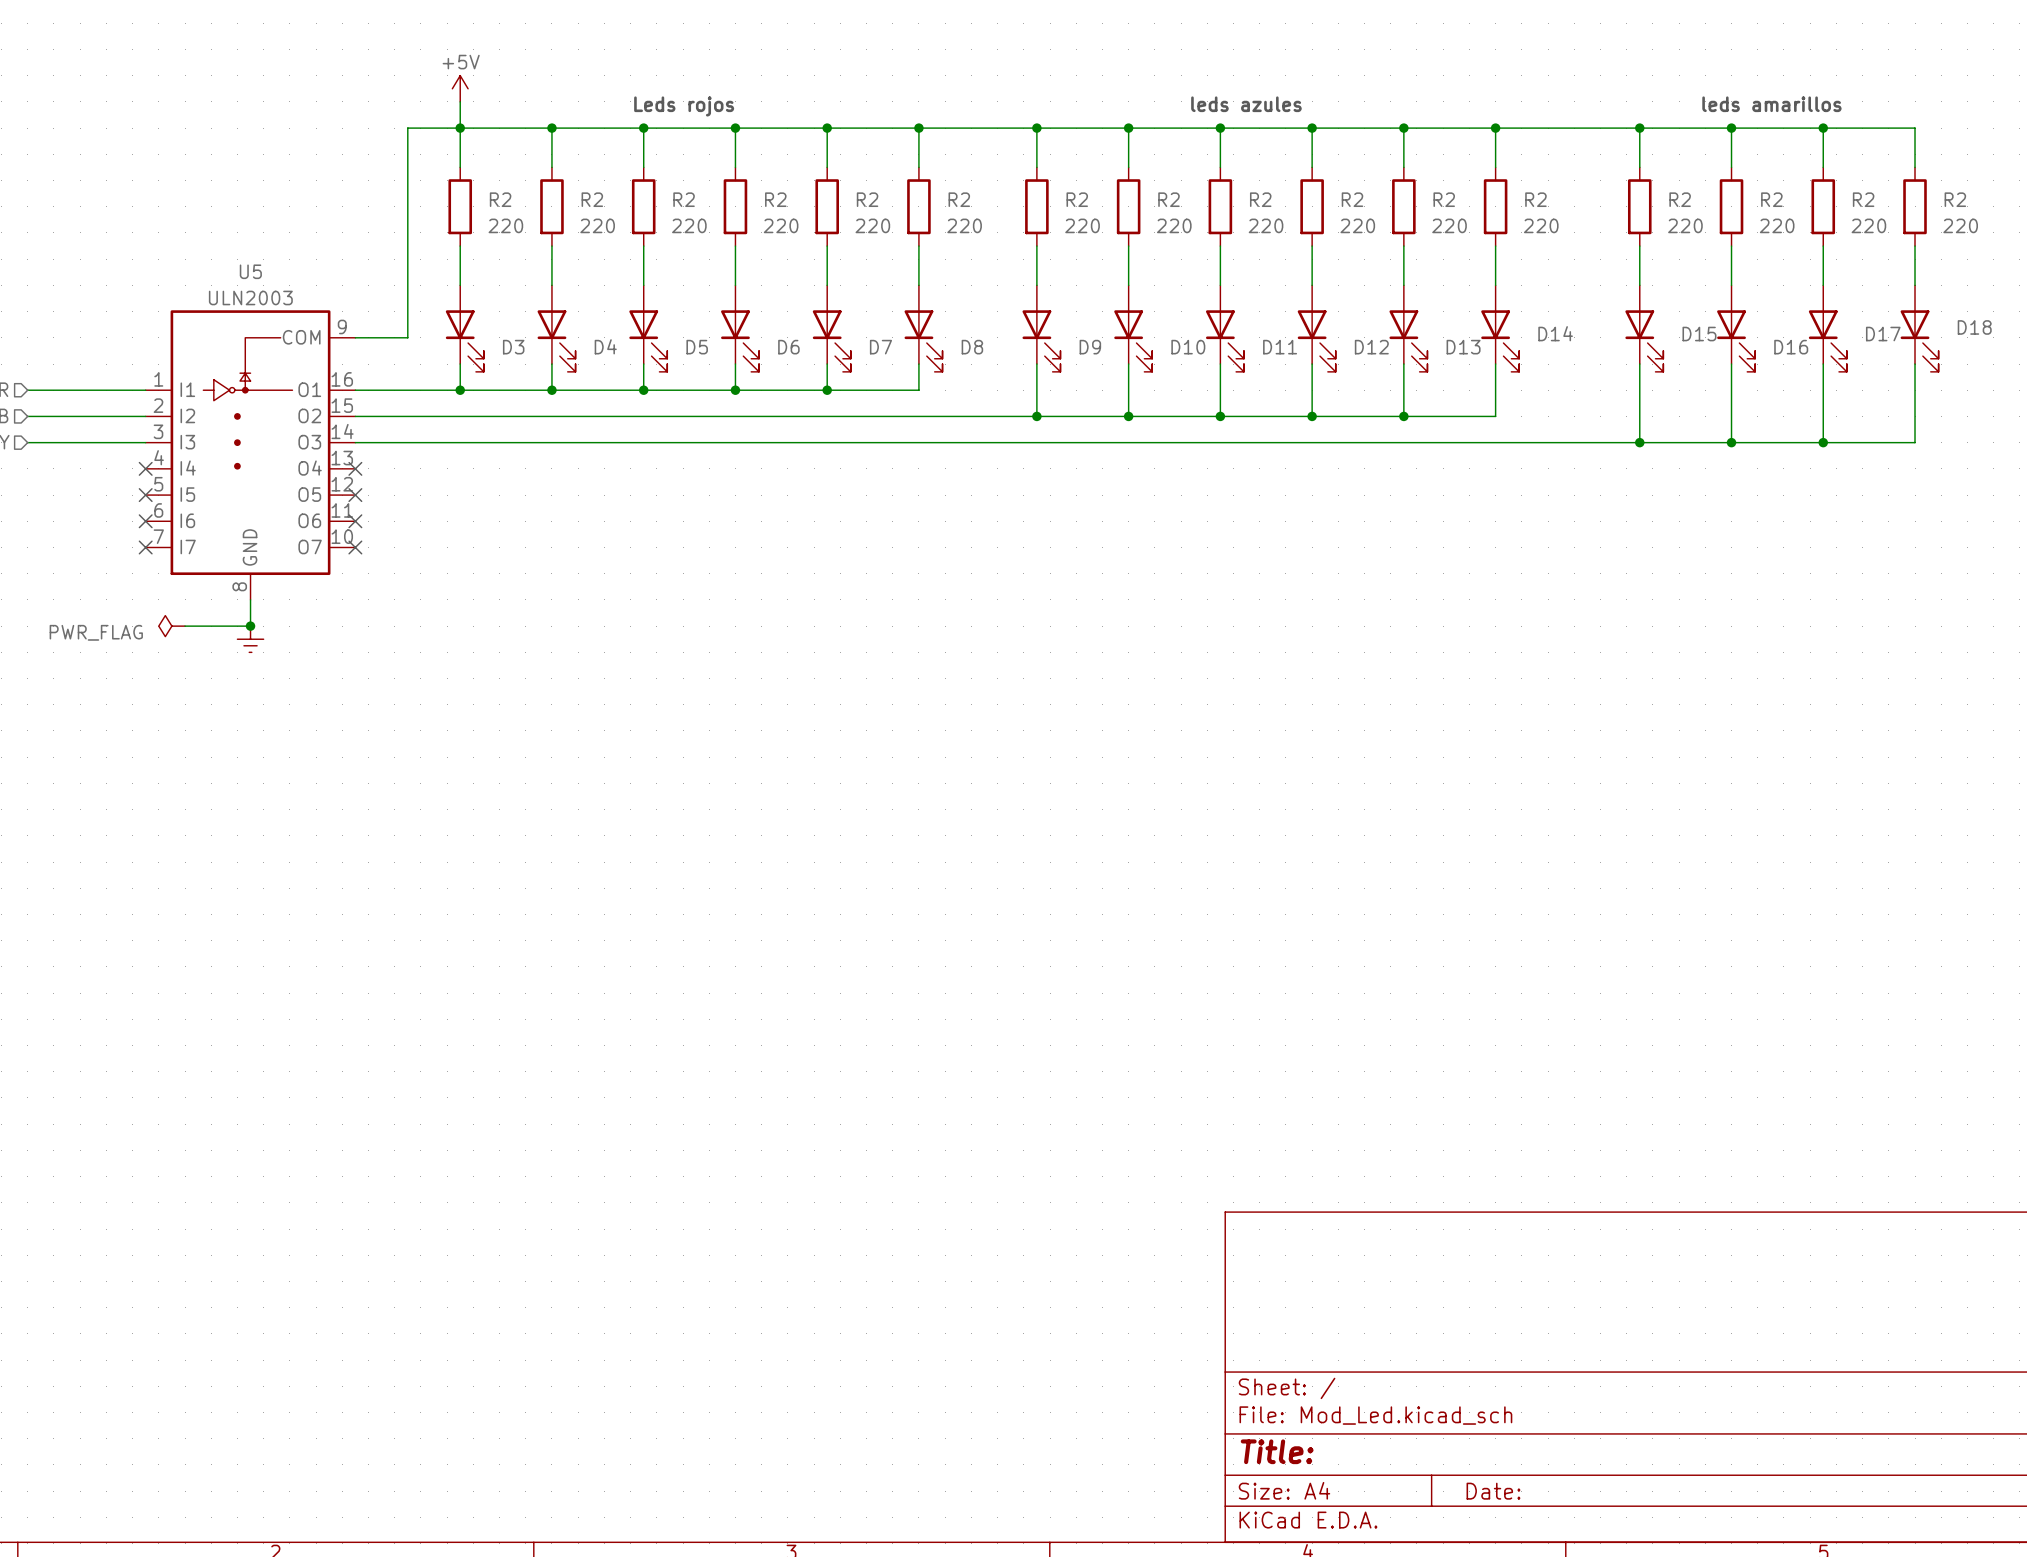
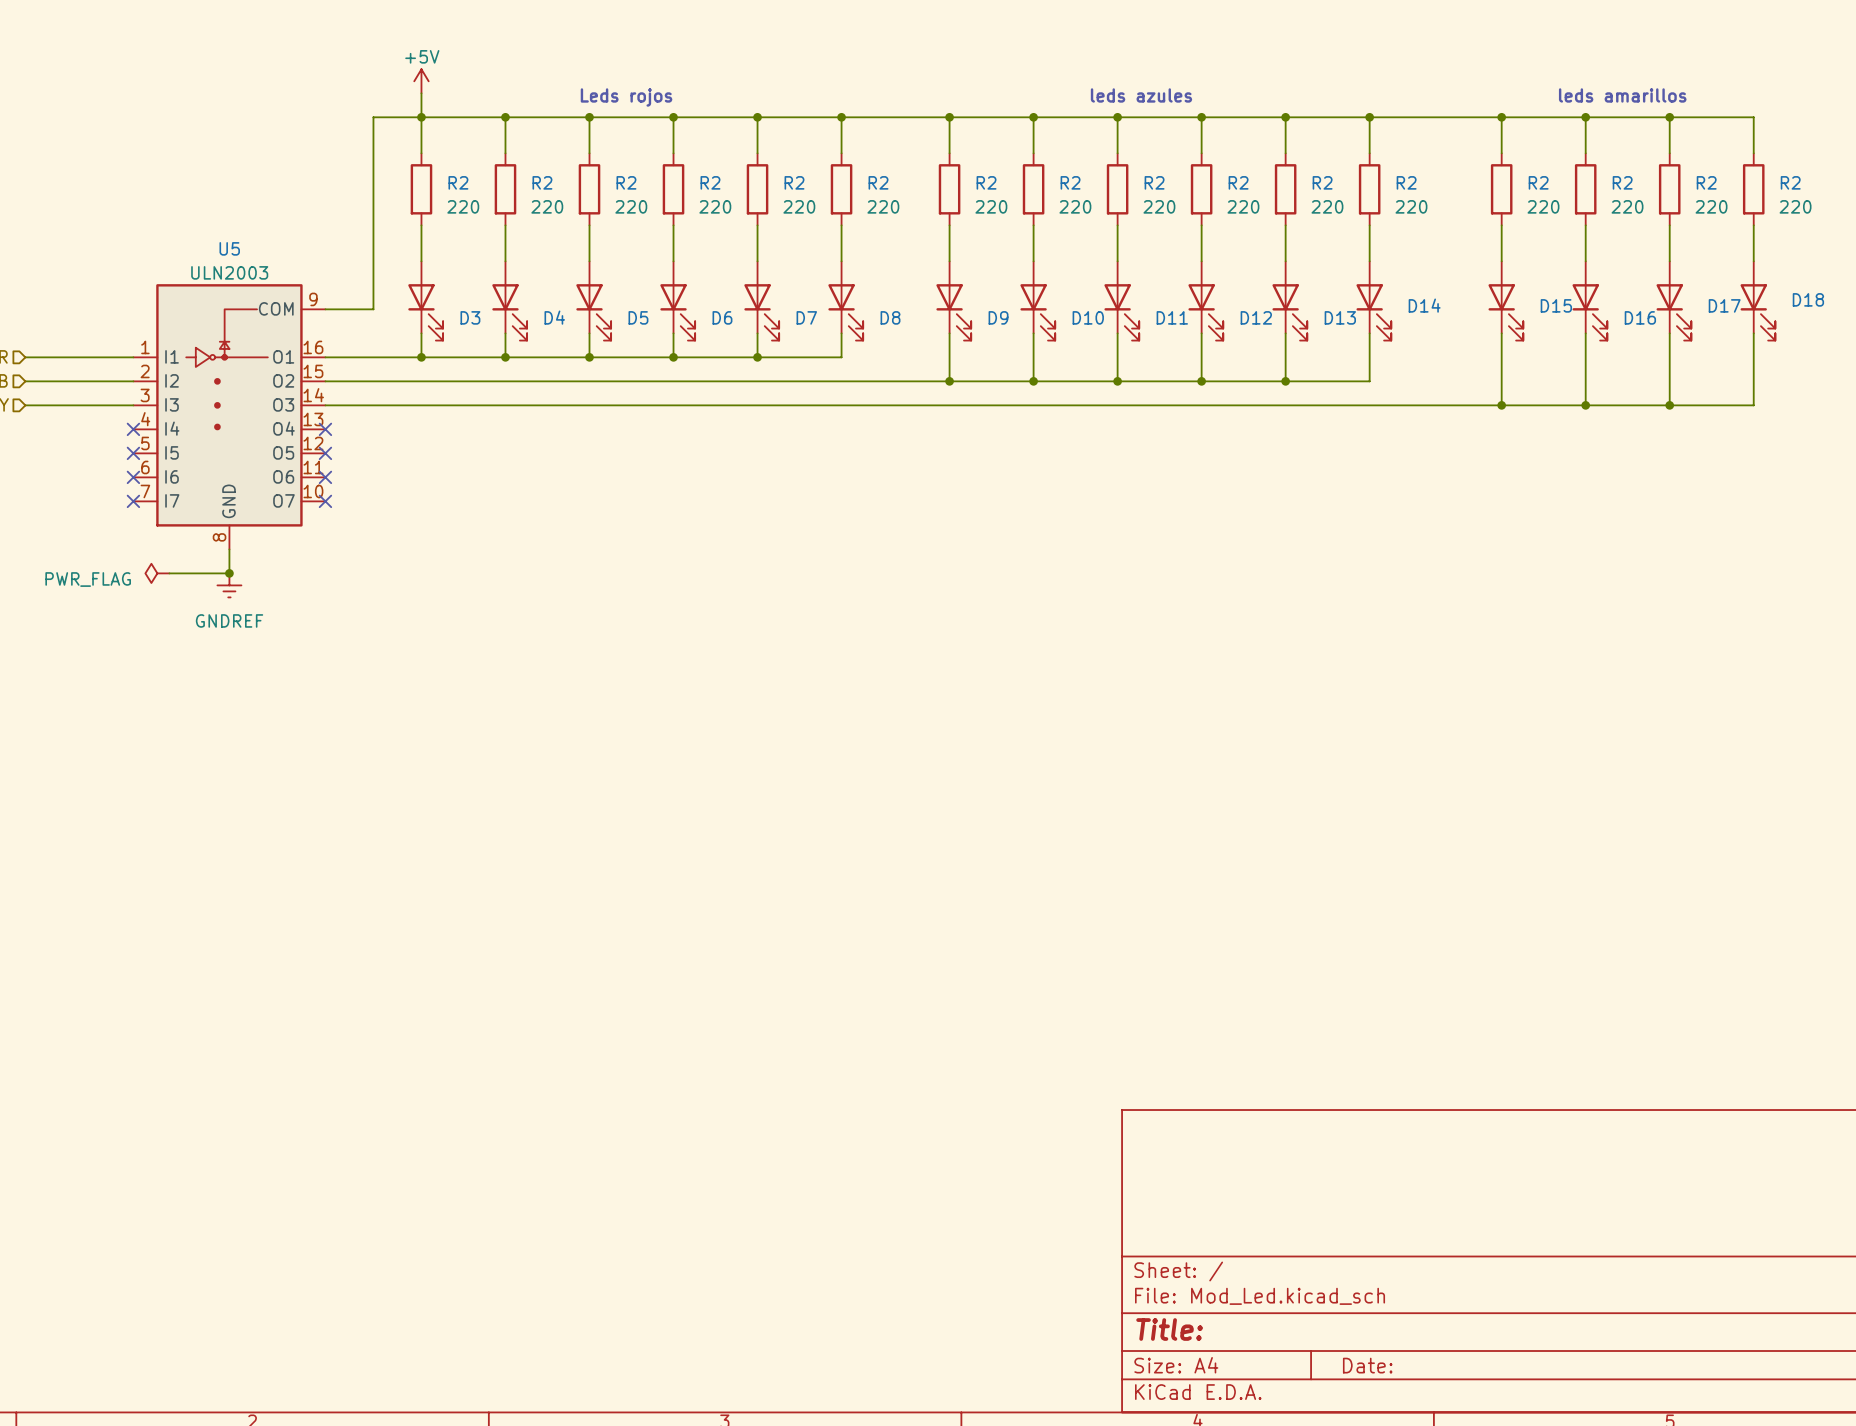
power symbol text: none -> GNDREF (229, 620)

